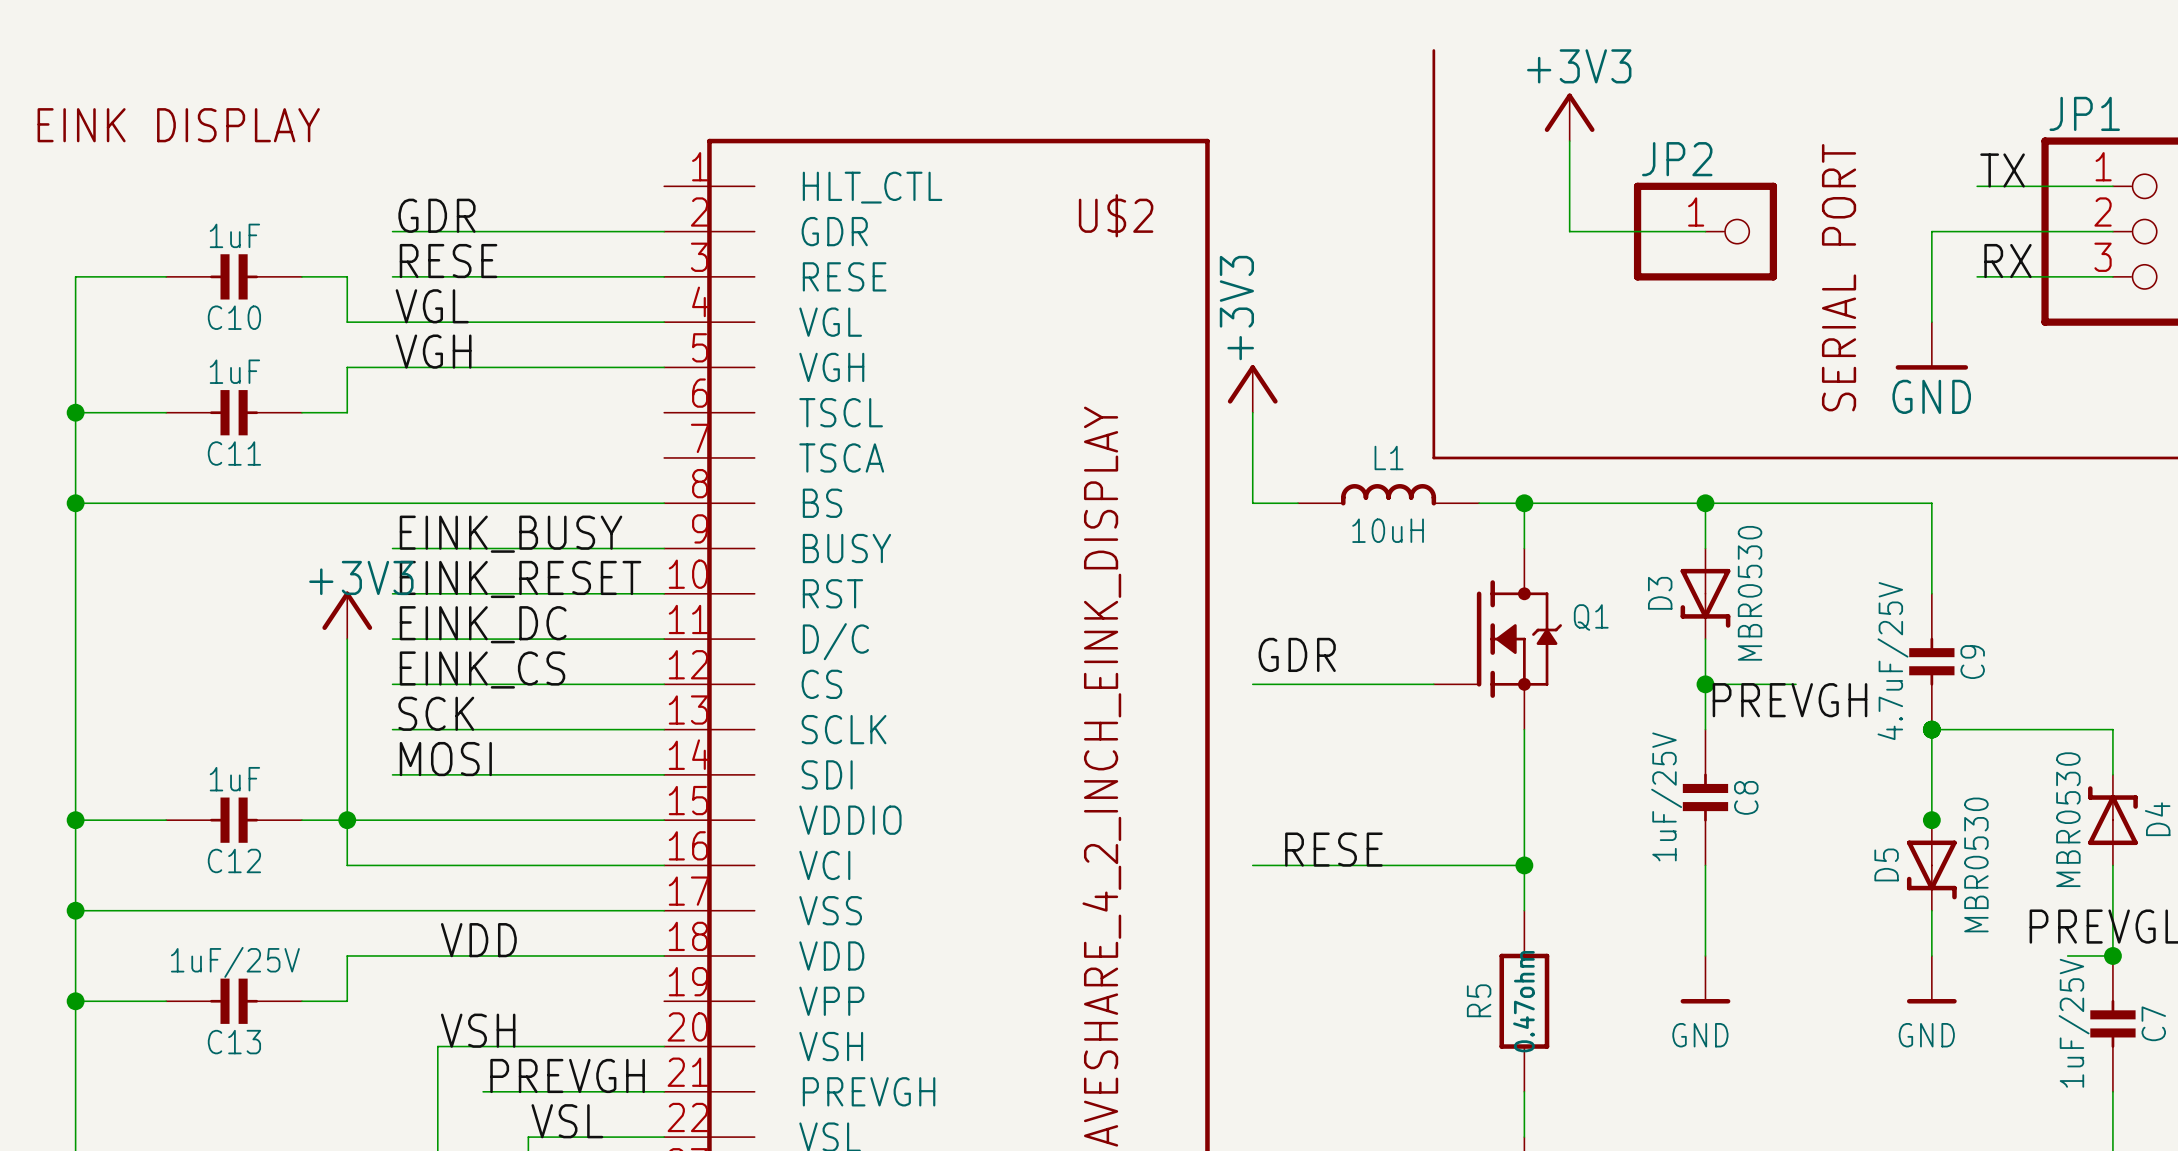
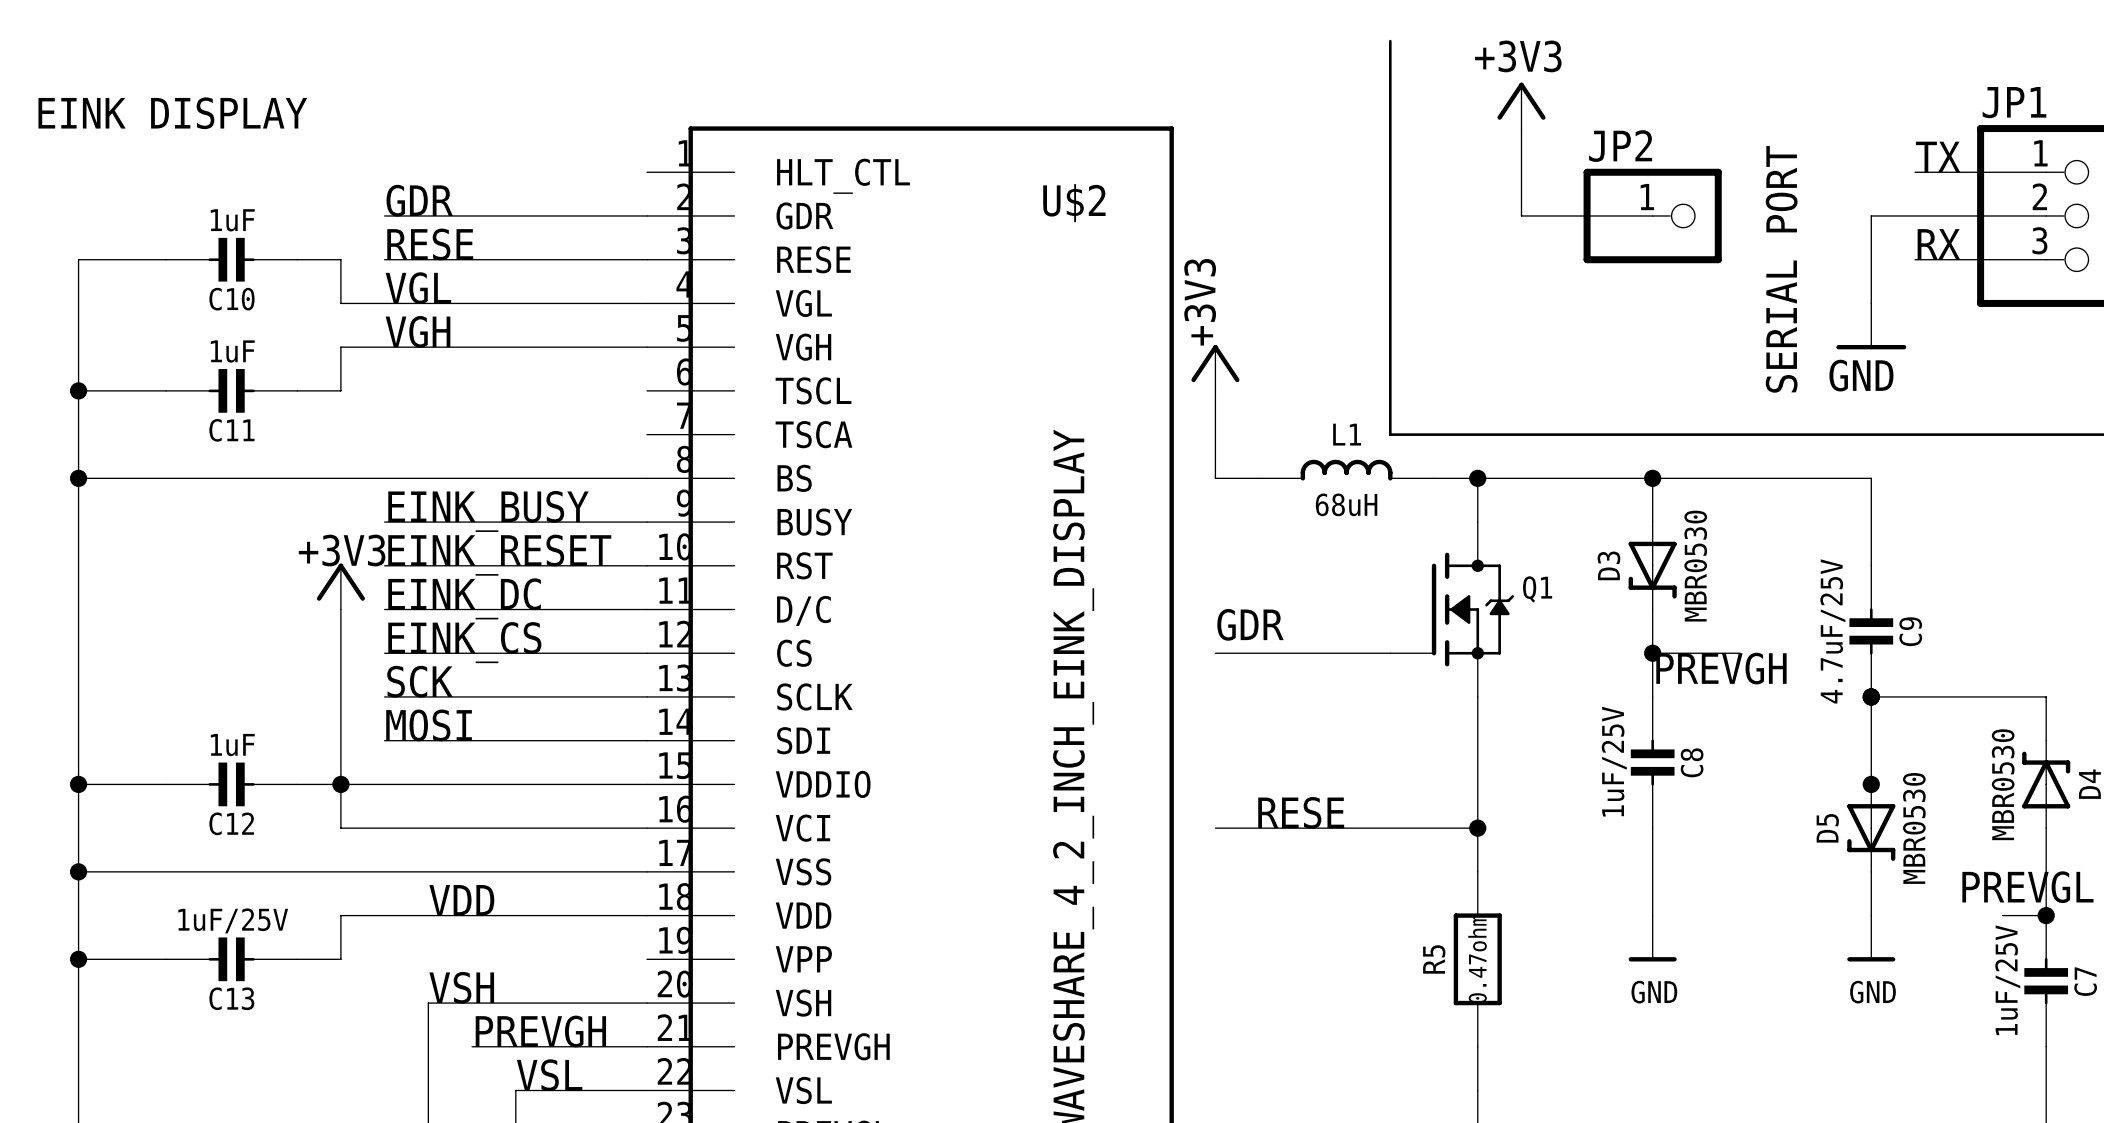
L1 value: 10uH (1388, 530) -> 68uH (1346, 504)

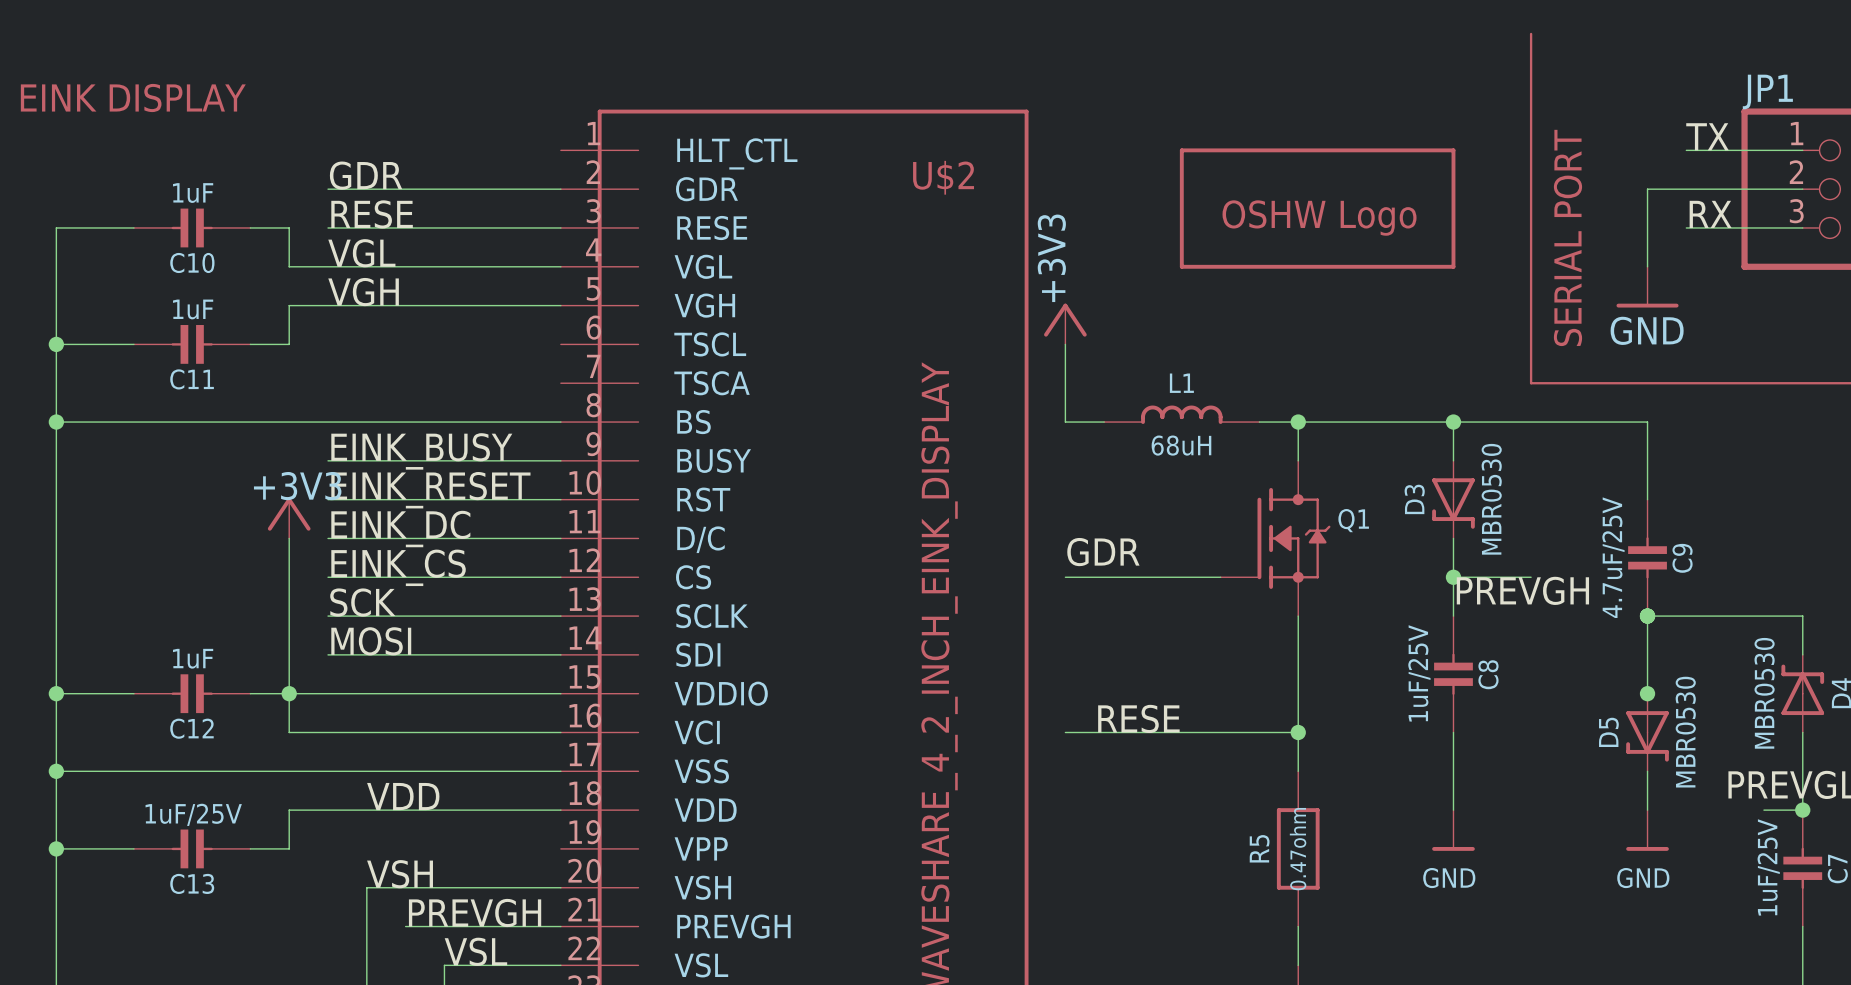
line: (1390, 41) (1390, 434) (1740, 434) -> (1531, 33) (1531, 383)
power symbol: +3V3 (1521, 105) -> none
wire: (1521, 128) (1521, 215) (1652, 215) -> none
JP2: (1652, 215) -> none
part: none -> (1317, 208)

